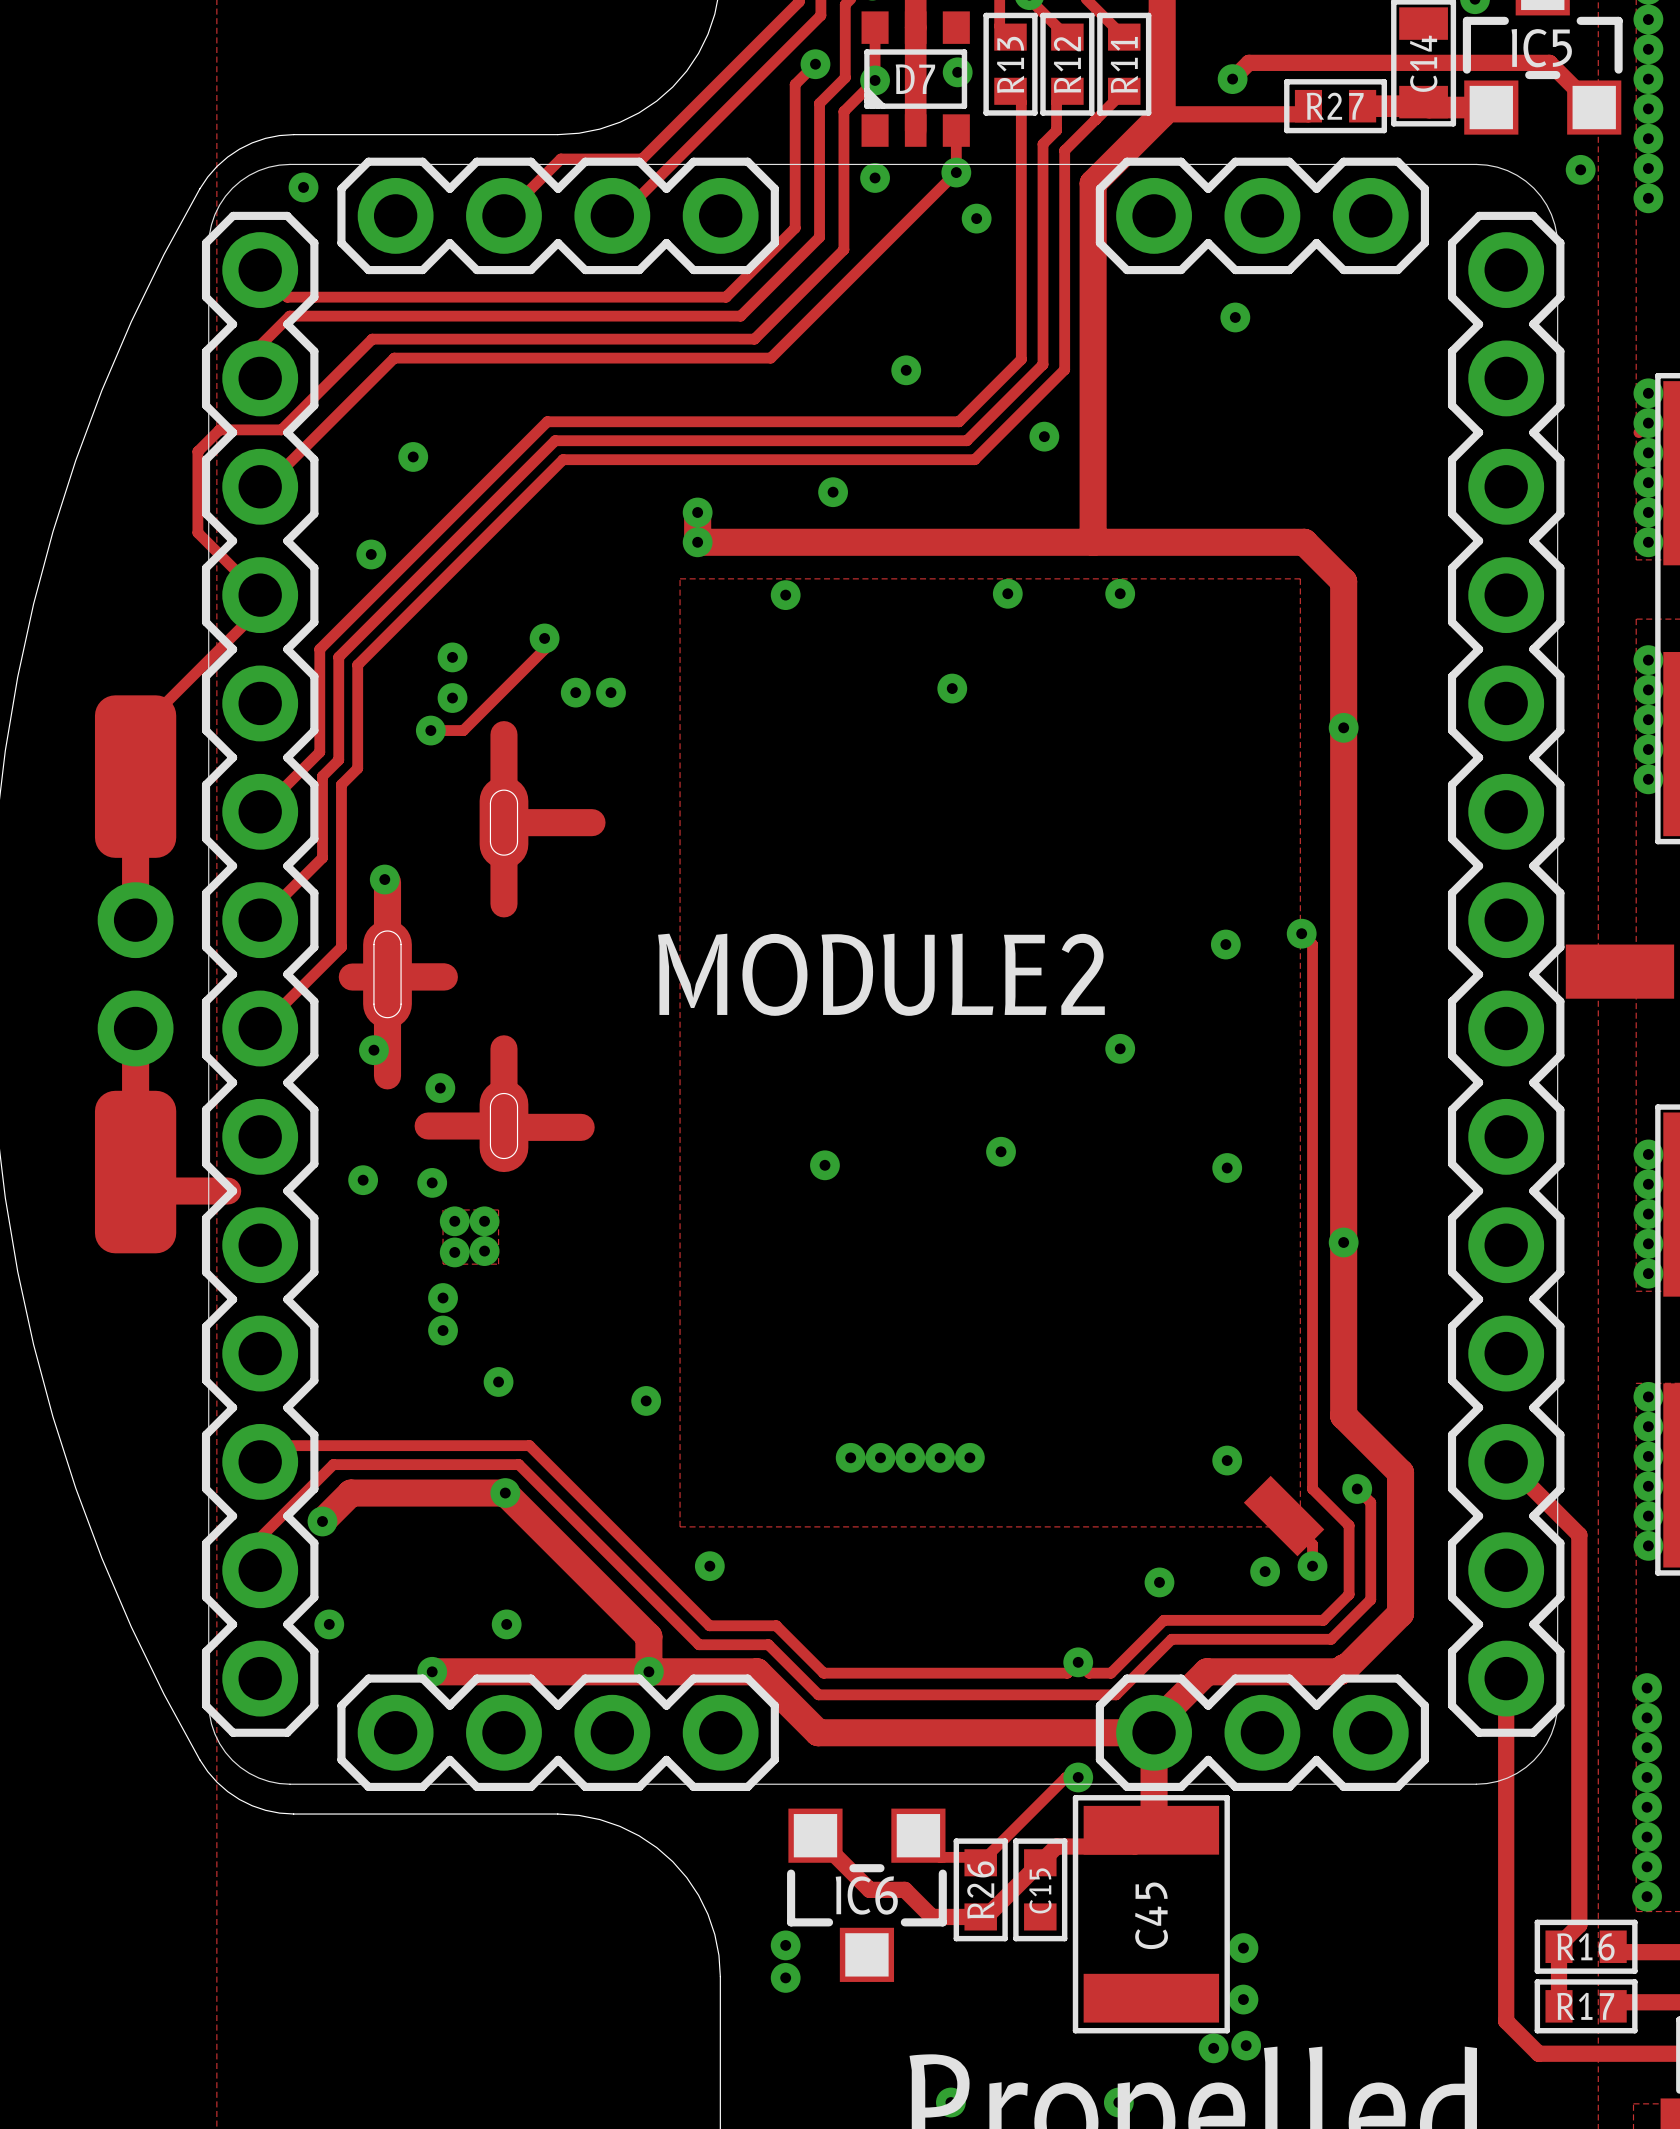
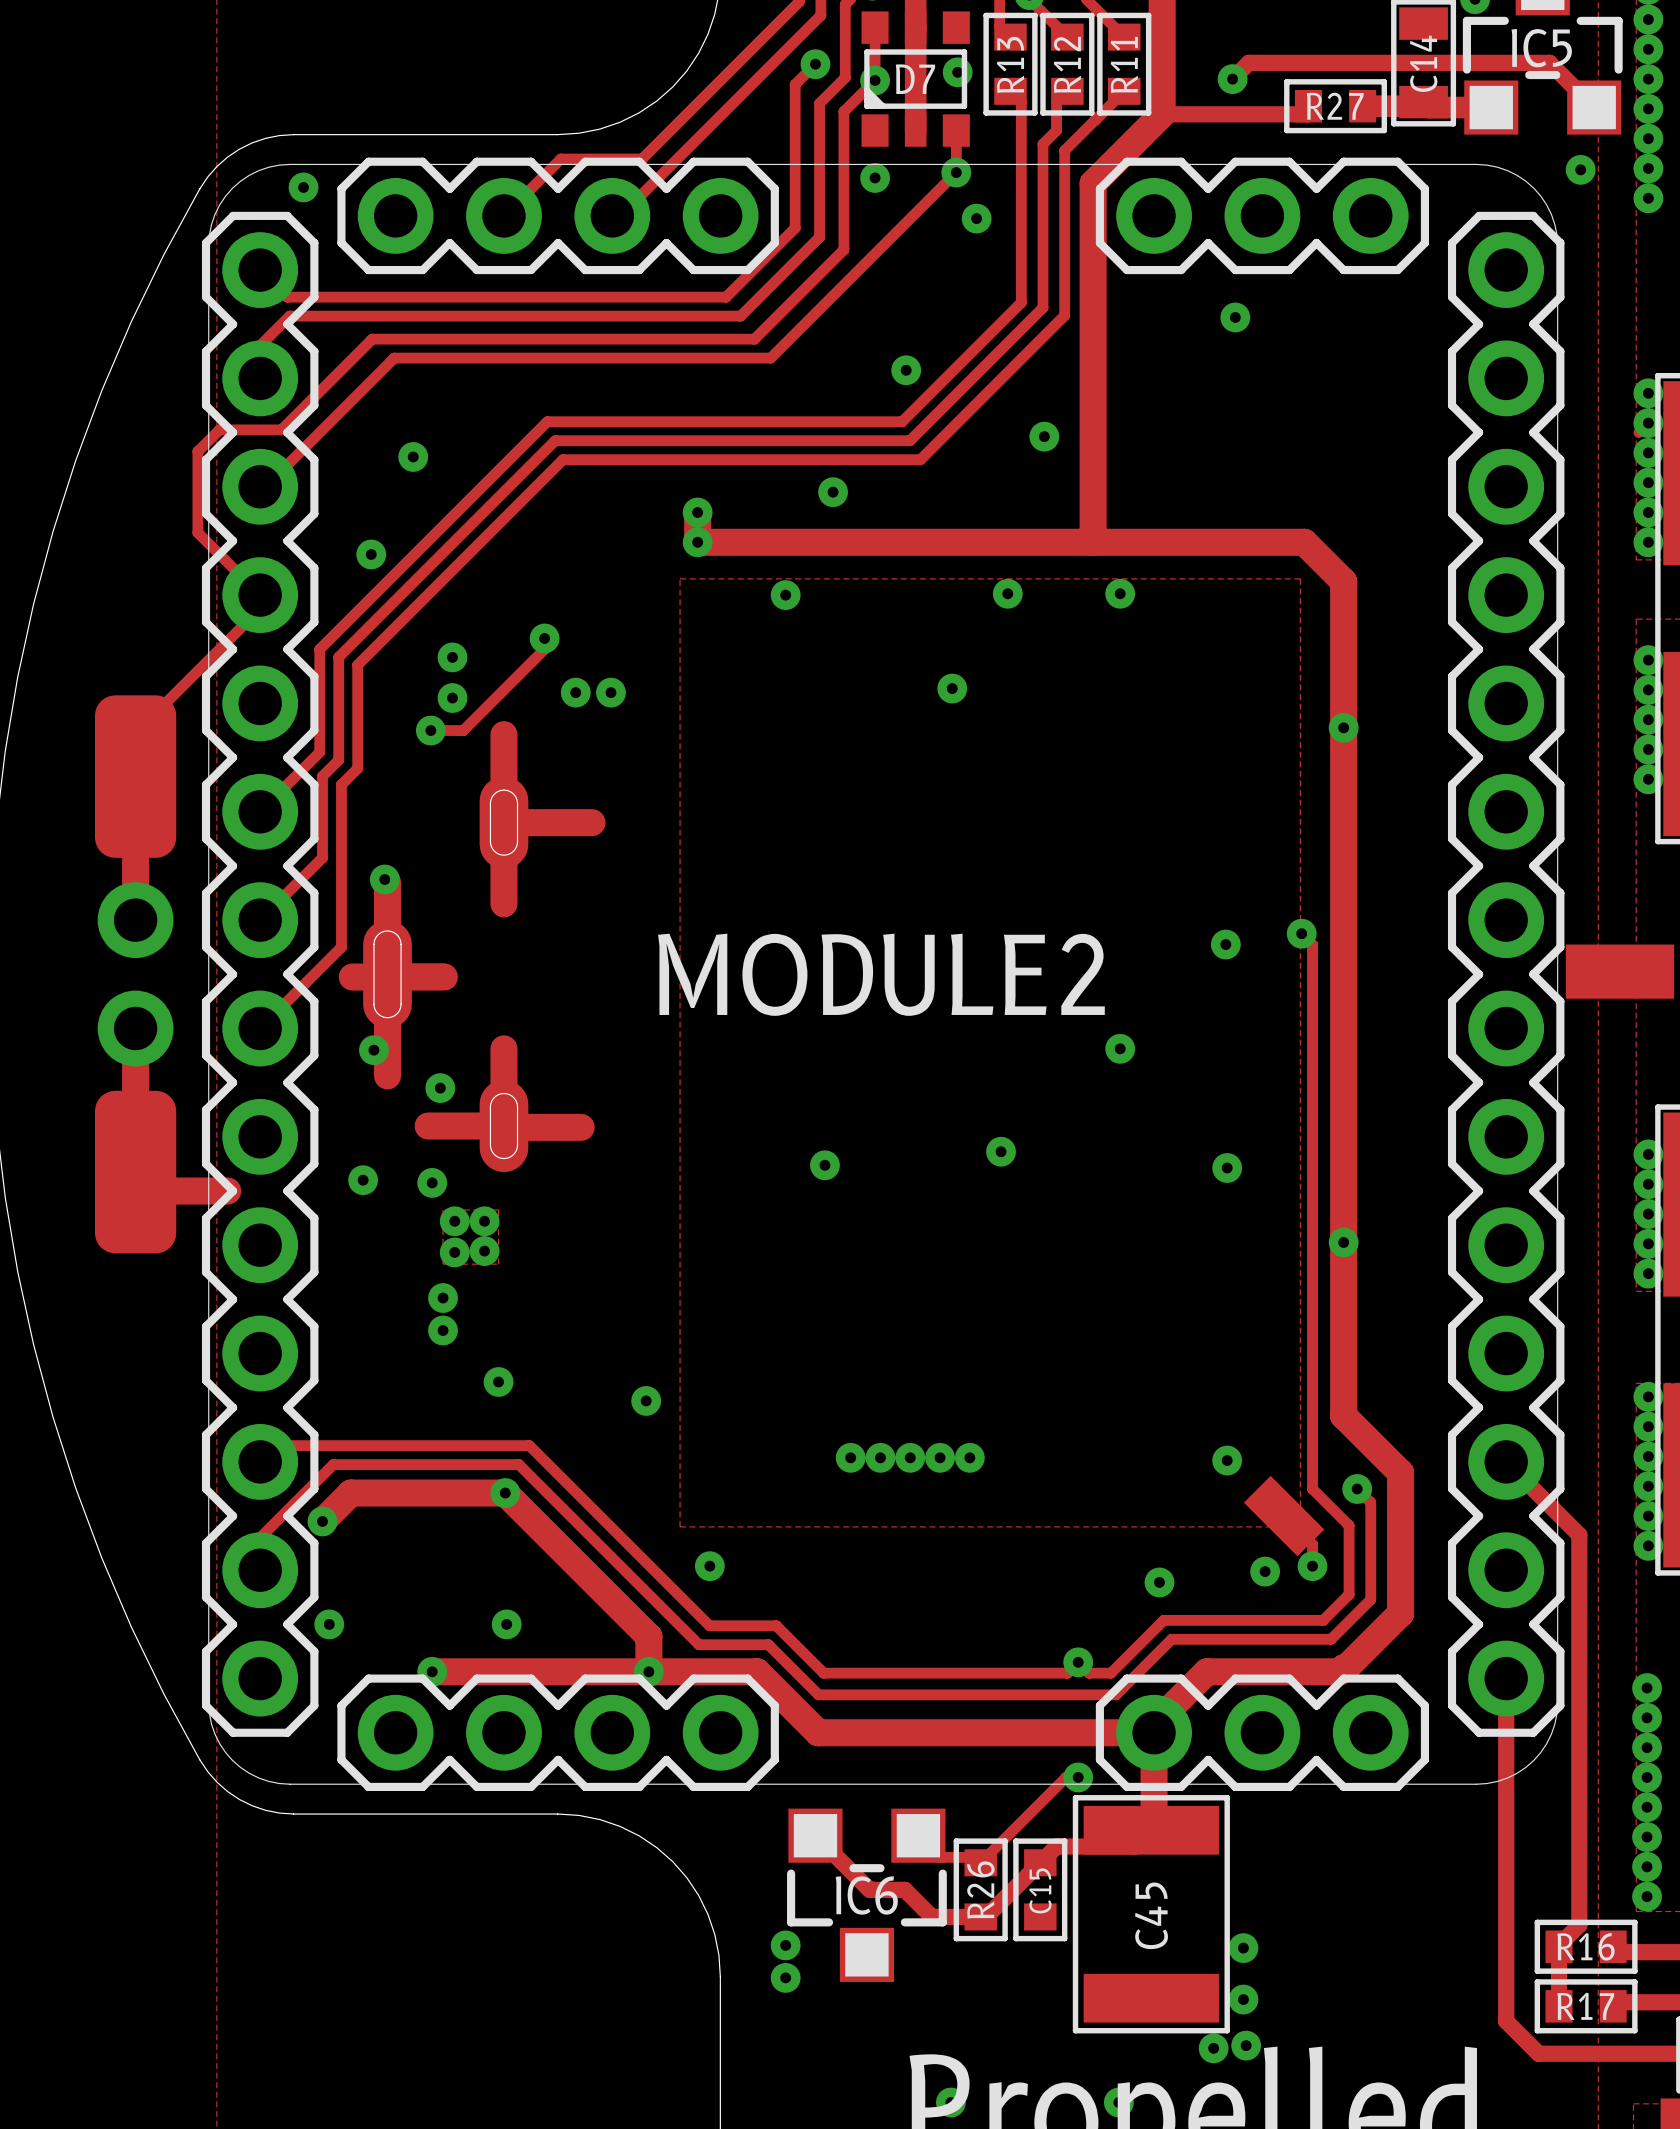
track: (1021, 302) (1021, 359) (959, 421) (902, 421) -> (1021, 302) (902, 421)
track: (1043, 307) (1043, 364) (966, 440) (910, 440) -> (1043, 307) (910, 440)
track: (1064, 315) (1064, 369) (974, 459) (920, 459) -> (1064, 315) (920, 459)

